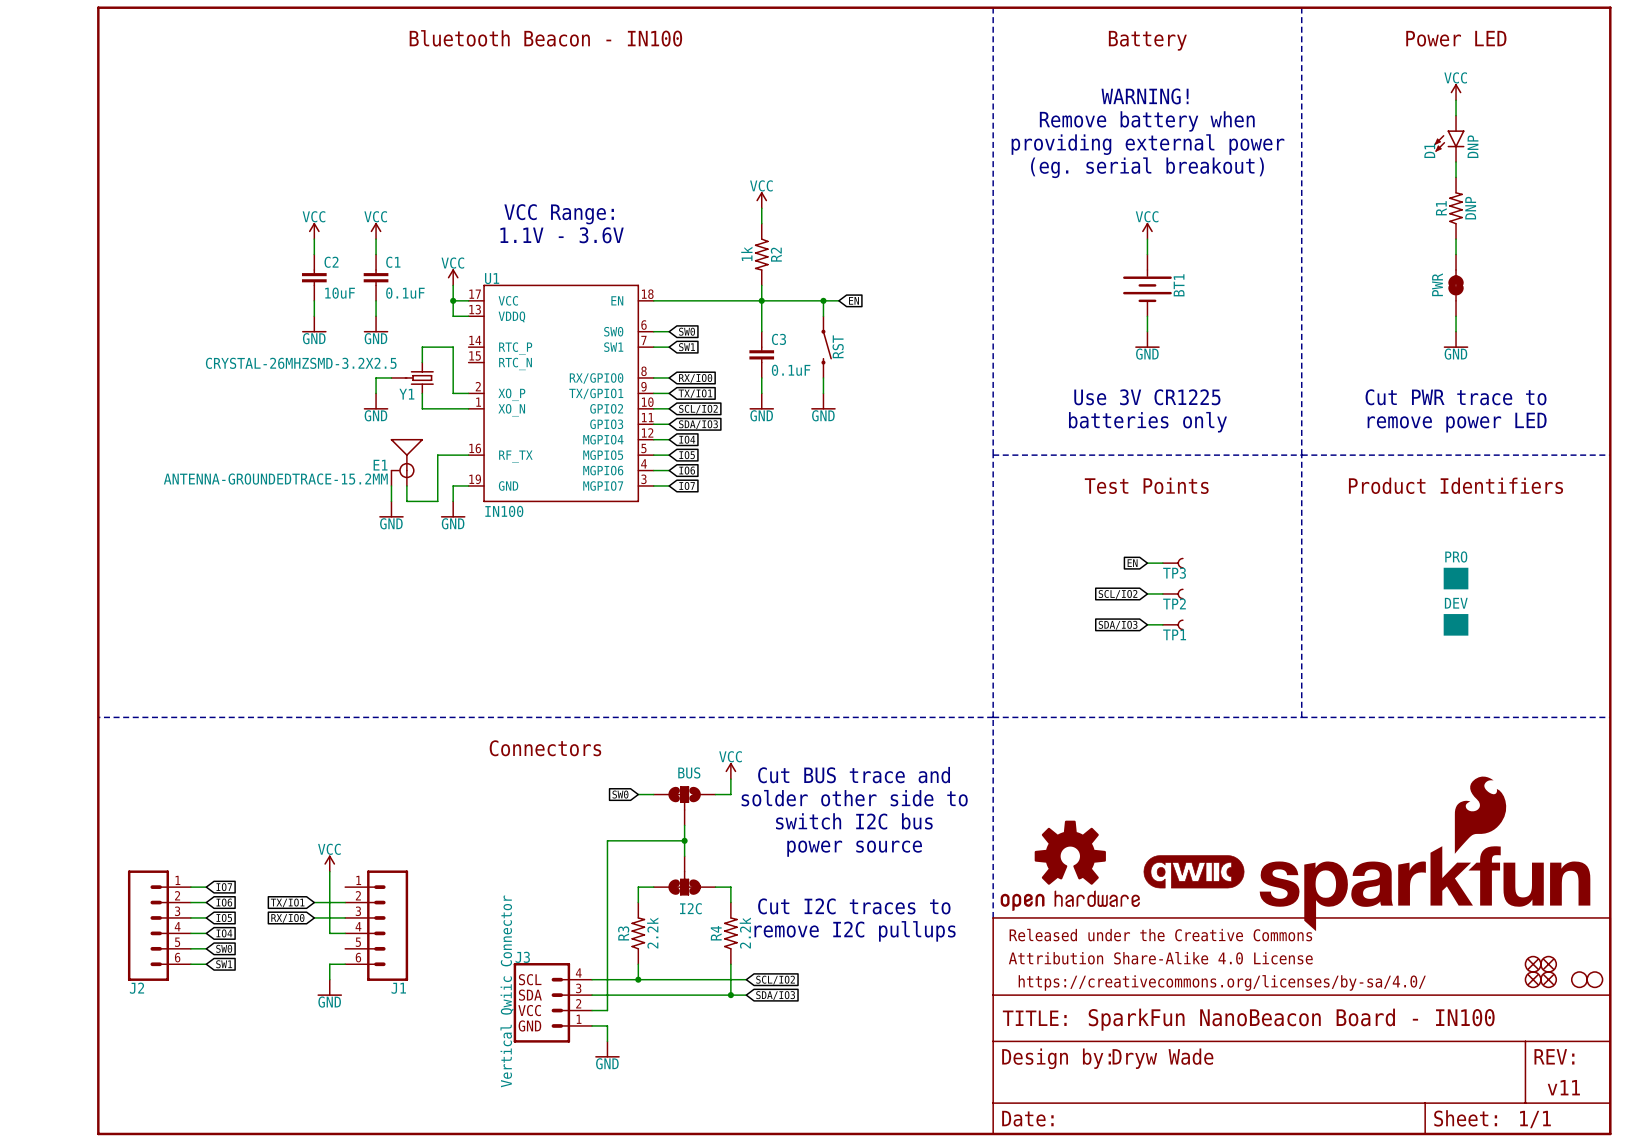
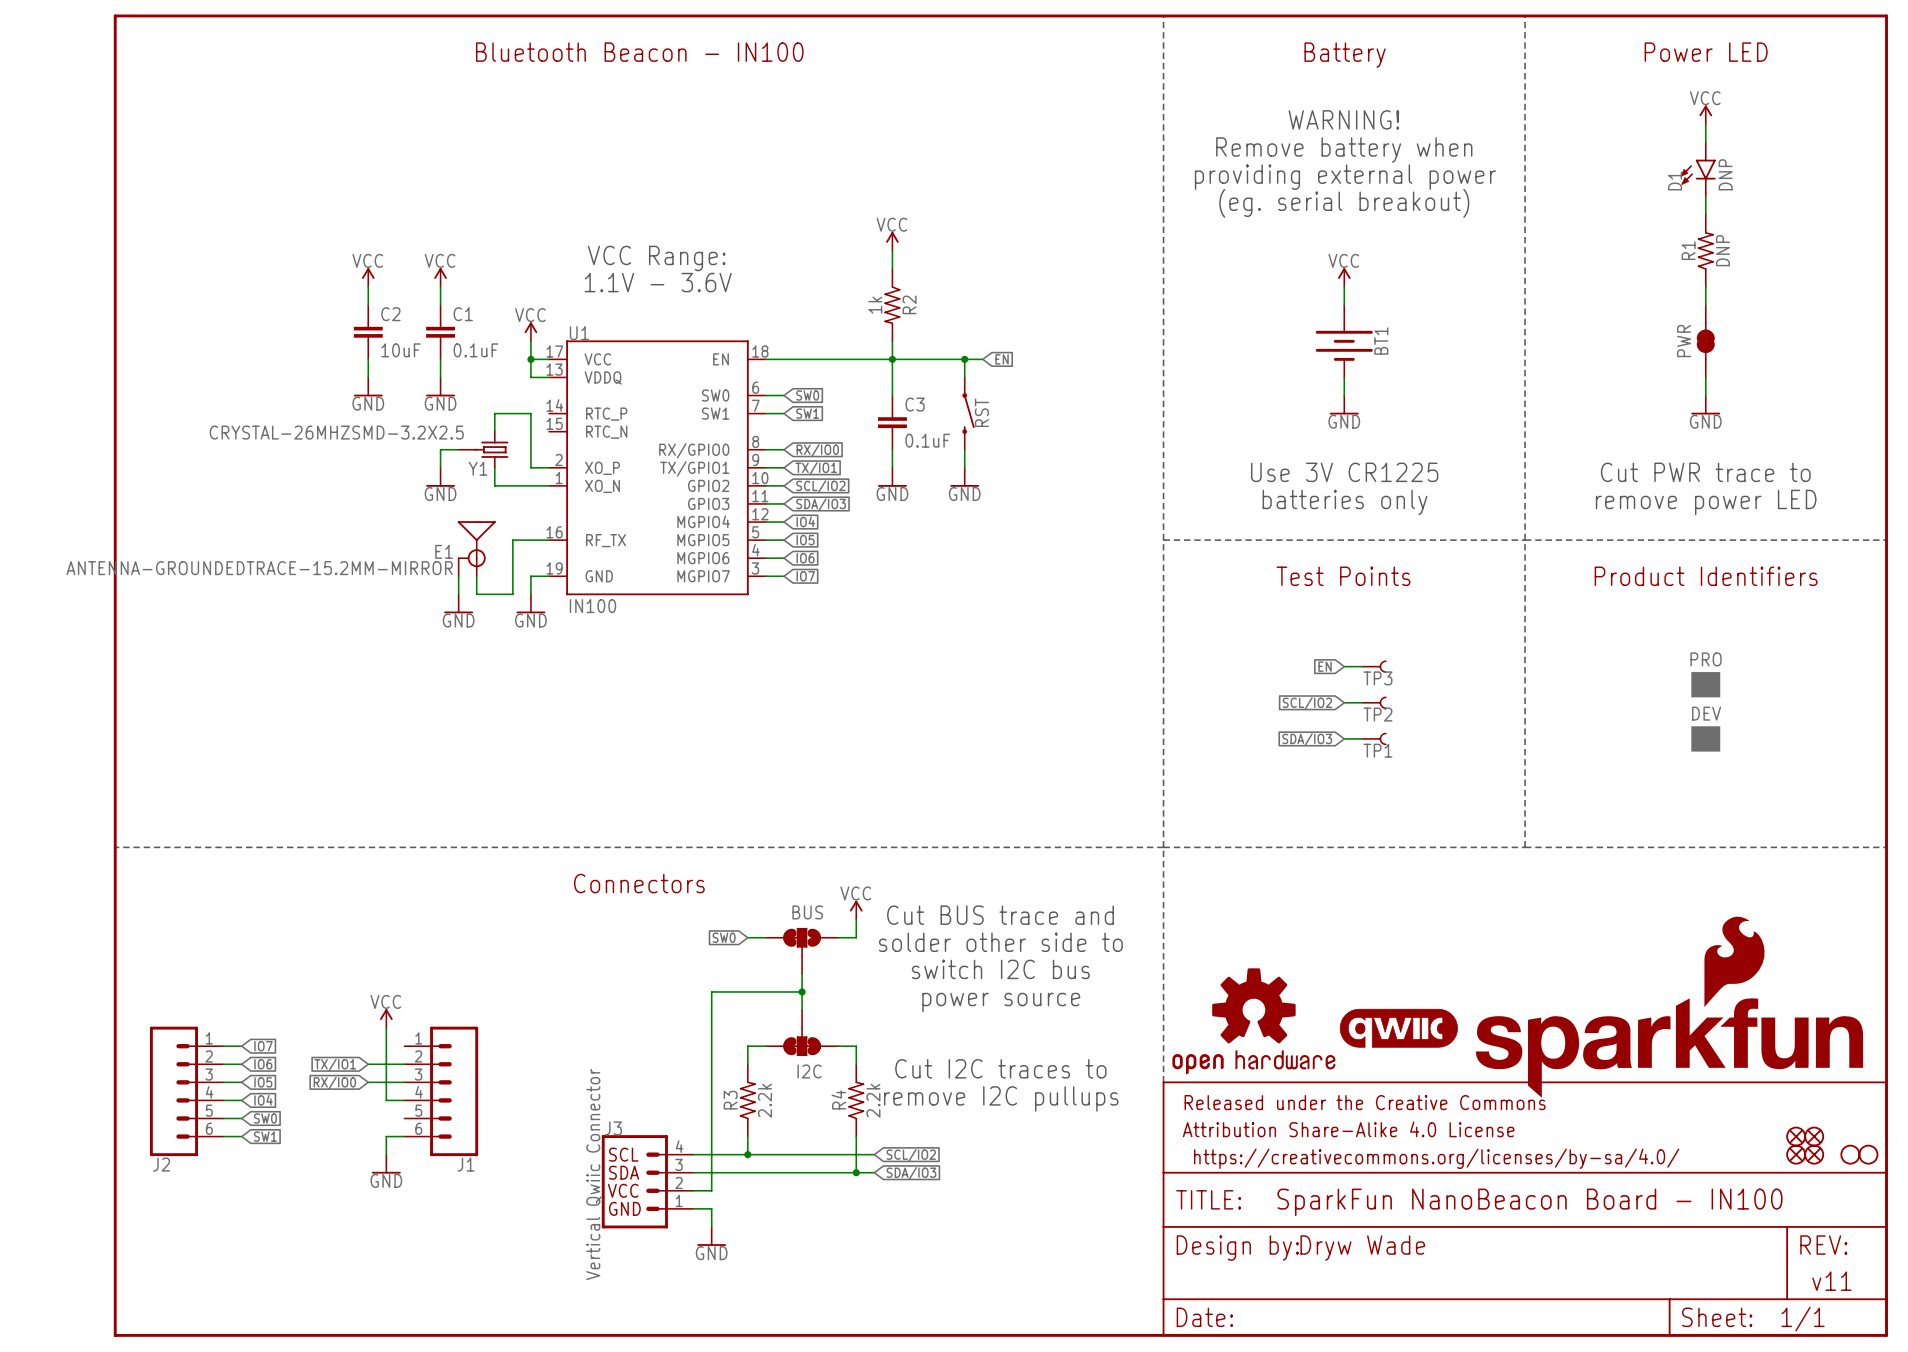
E1 value: ANTENNA-GROUNDEDTRACE-15.2MM (275, 479) -> ANTENNA-GROUNDEDTRACE-15.2MM-MIRROR (259, 568)

